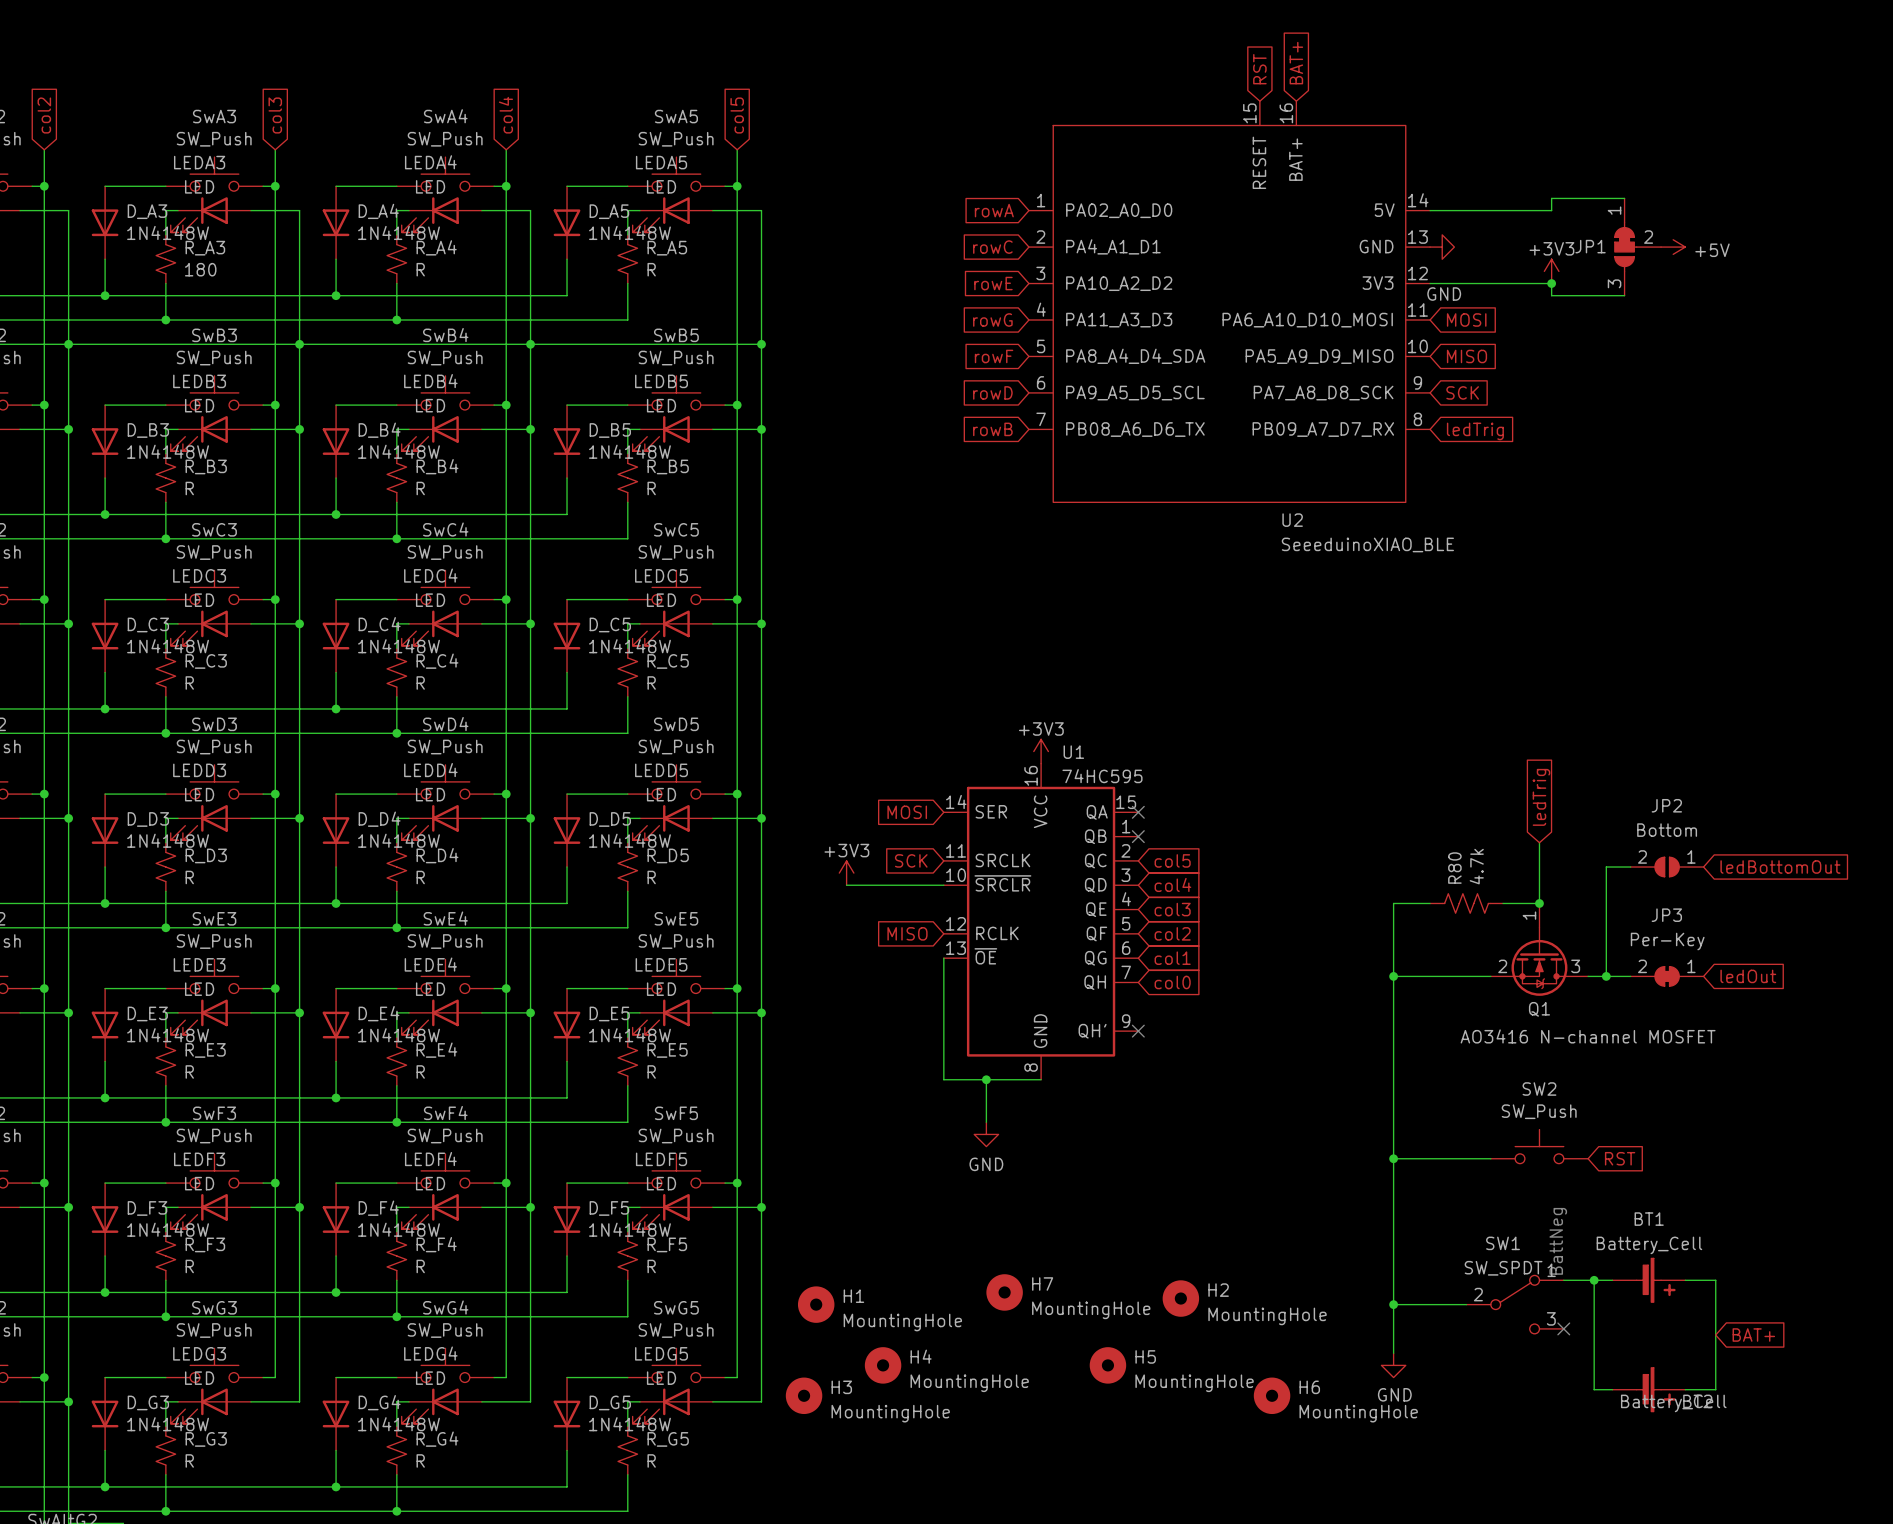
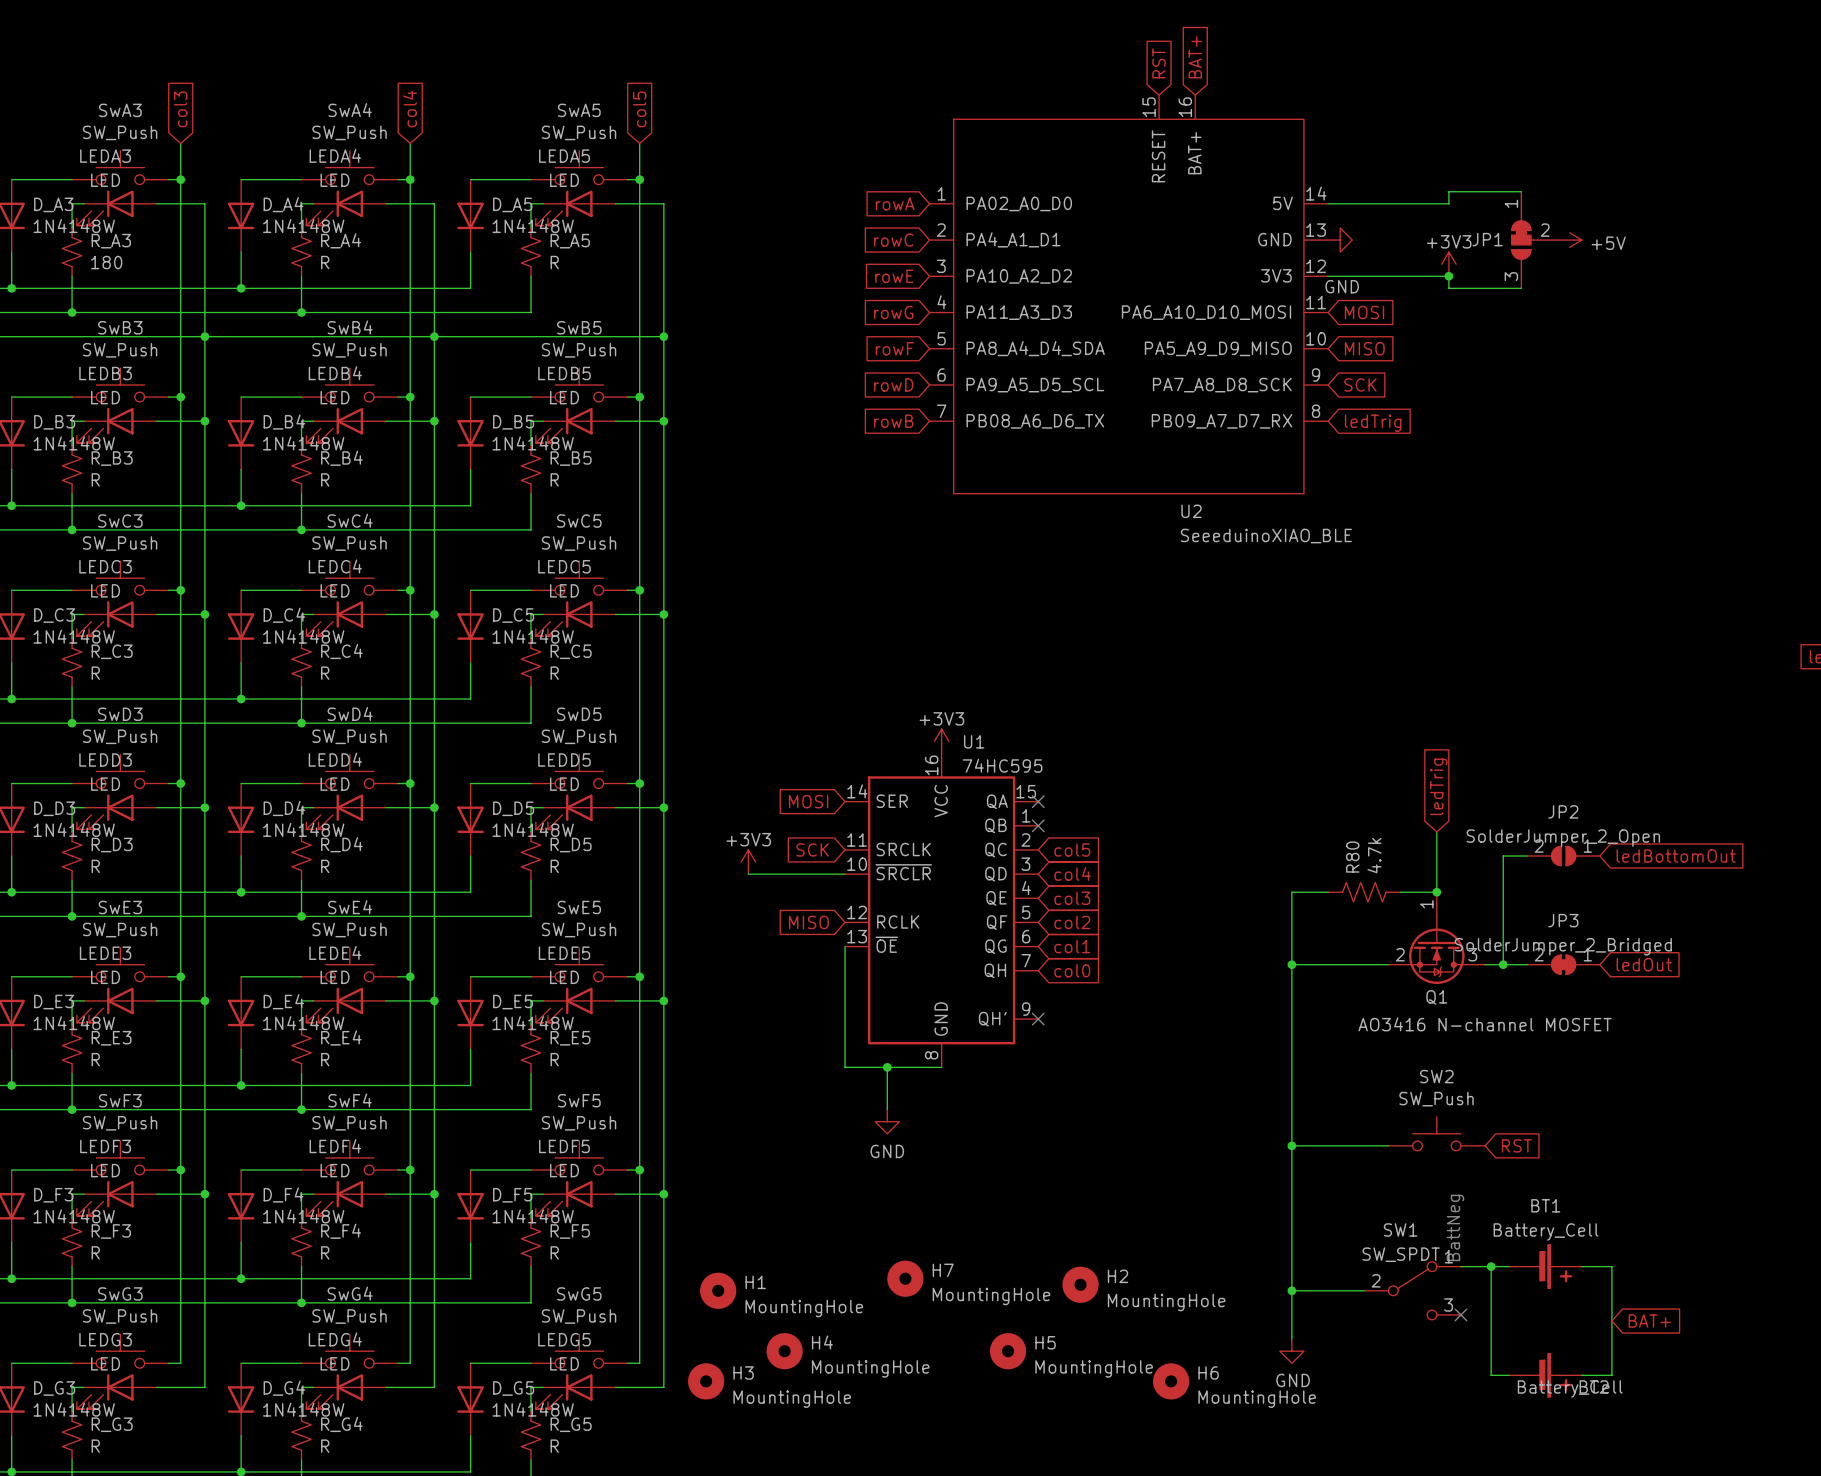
JP2 name position: JP2 (1666, 805) -> JP2 (1563, 811)
JP2 value: Bottom (1667, 830) -> SolderJumper_2_Open (1563, 838)
JP3 name position: JP3 (1666, 915) -> JP3 (1563, 920)
JP3 value: Per-Key (1667, 941) -> SolderJumper_2_Bridged (1563, 946)

